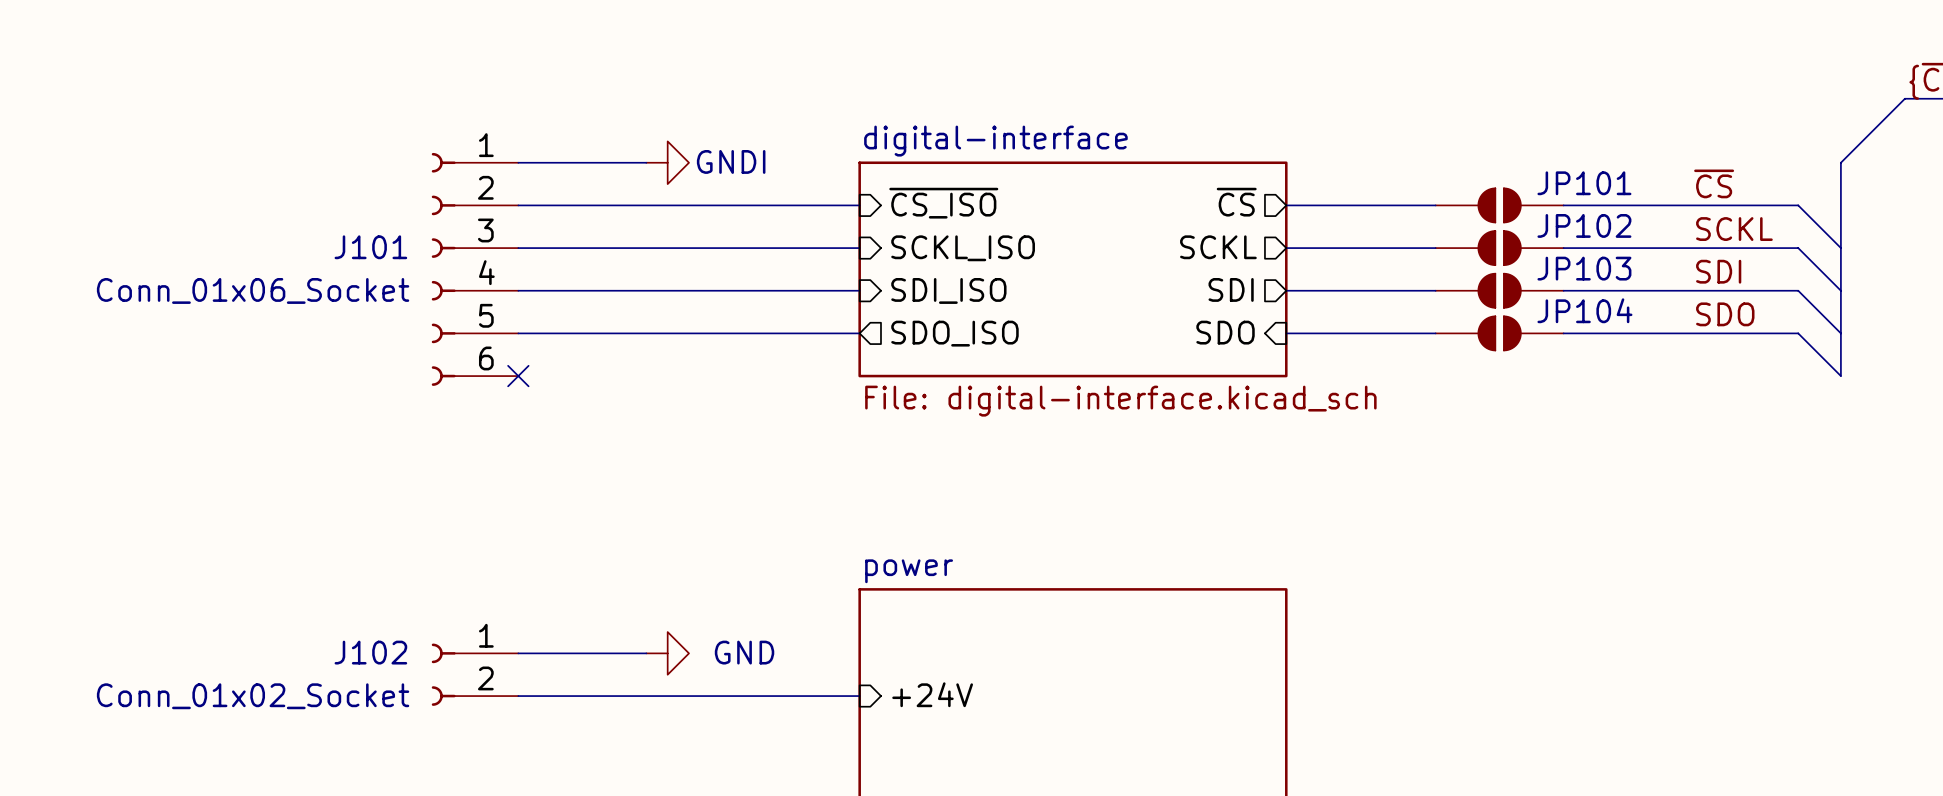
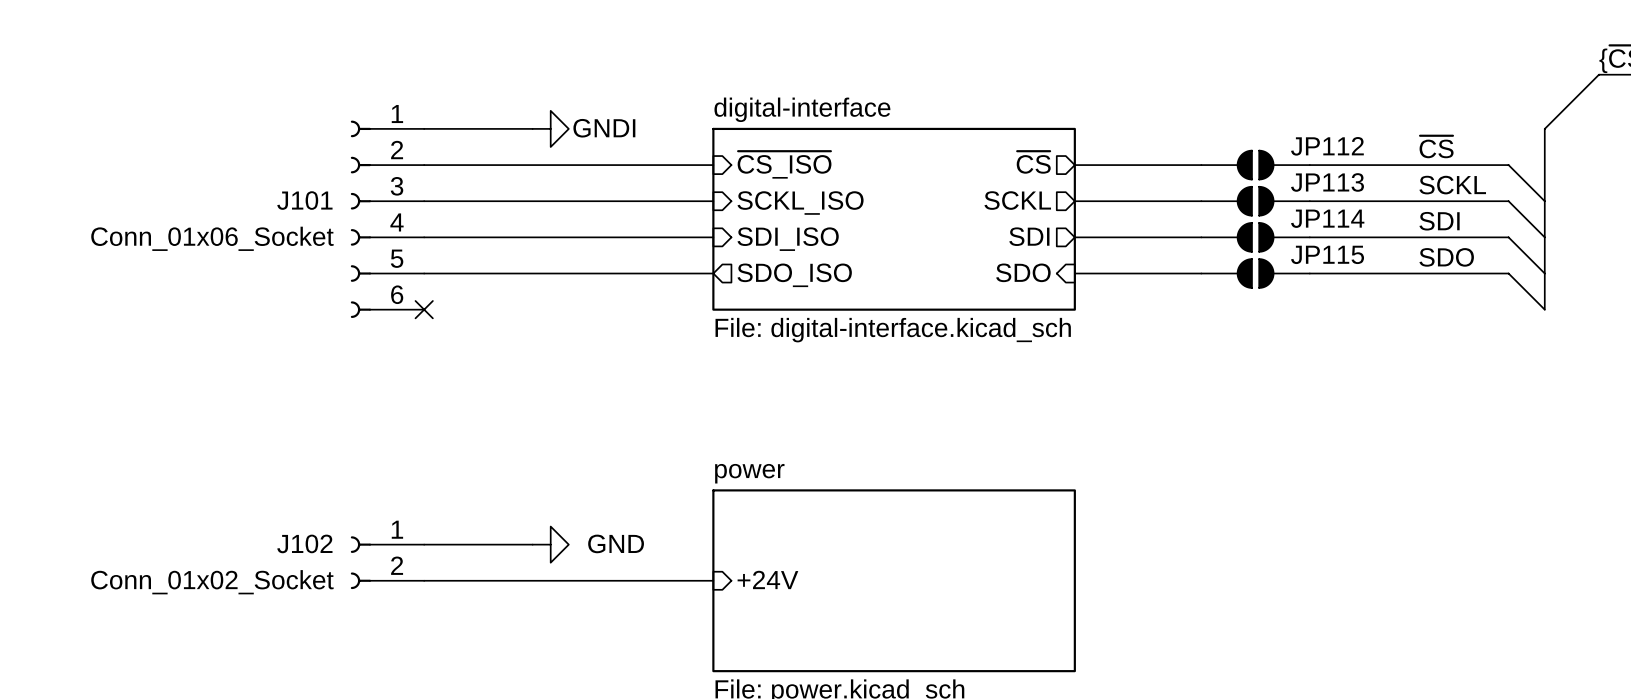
JP101 name: JP101 (1584, 183) -> JP112 (1327, 146)
JP102 name: JP102 (1584, 225) -> JP113 (1327, 182)
JP103 name: JP103 (1584, 268) -> JP114 (1327, 218)
JP104 name: JP104 (1584, 310) -> JP115 (1327, 254)

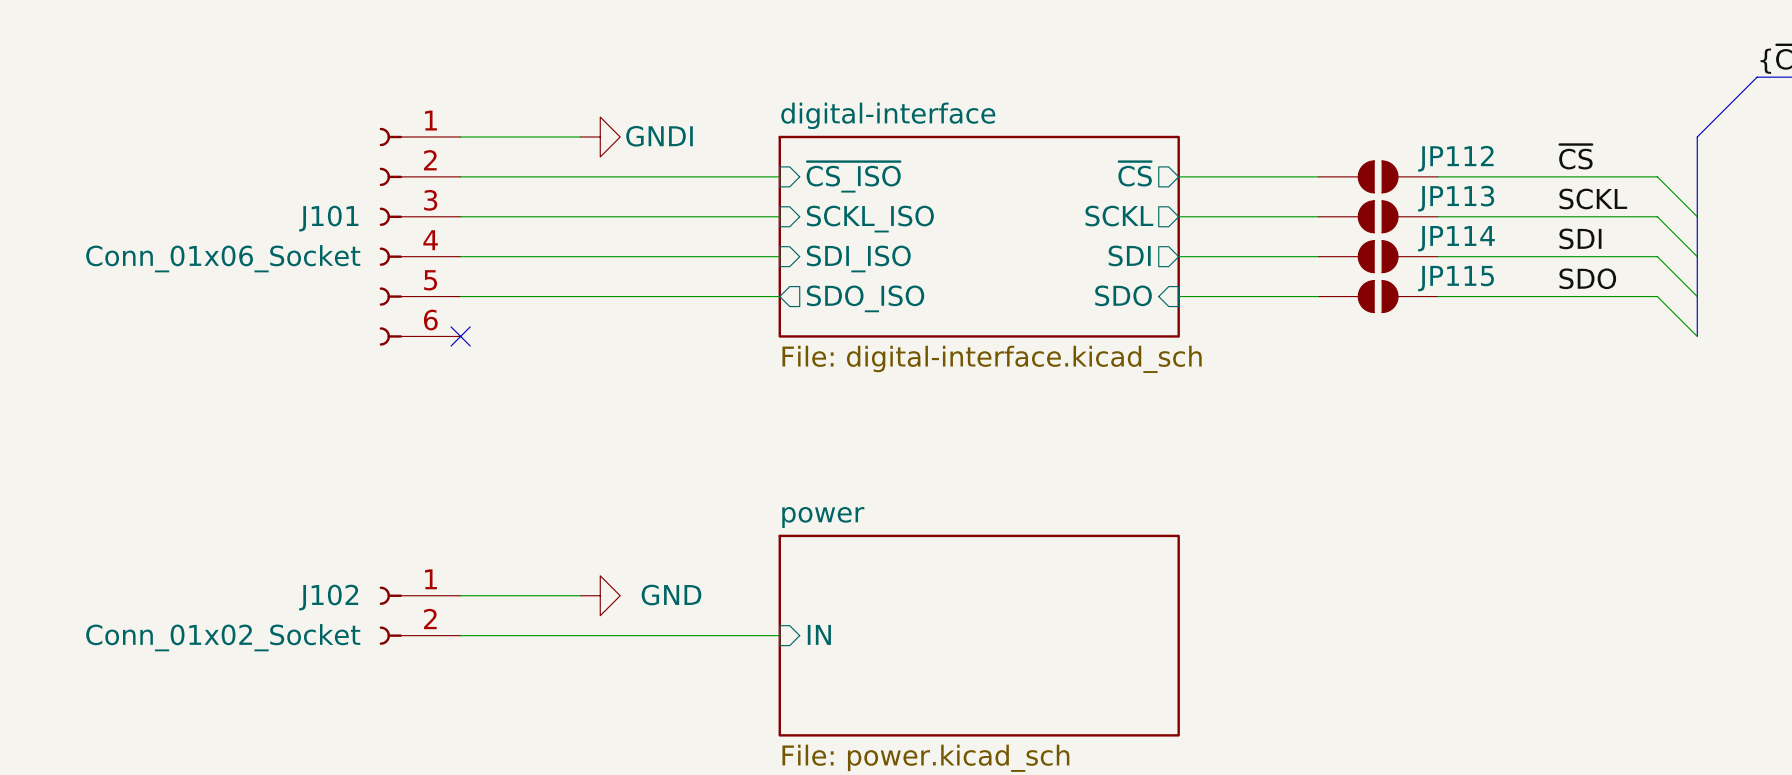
sheet pin: +24V (767, 579) -> IN (819, 634)

